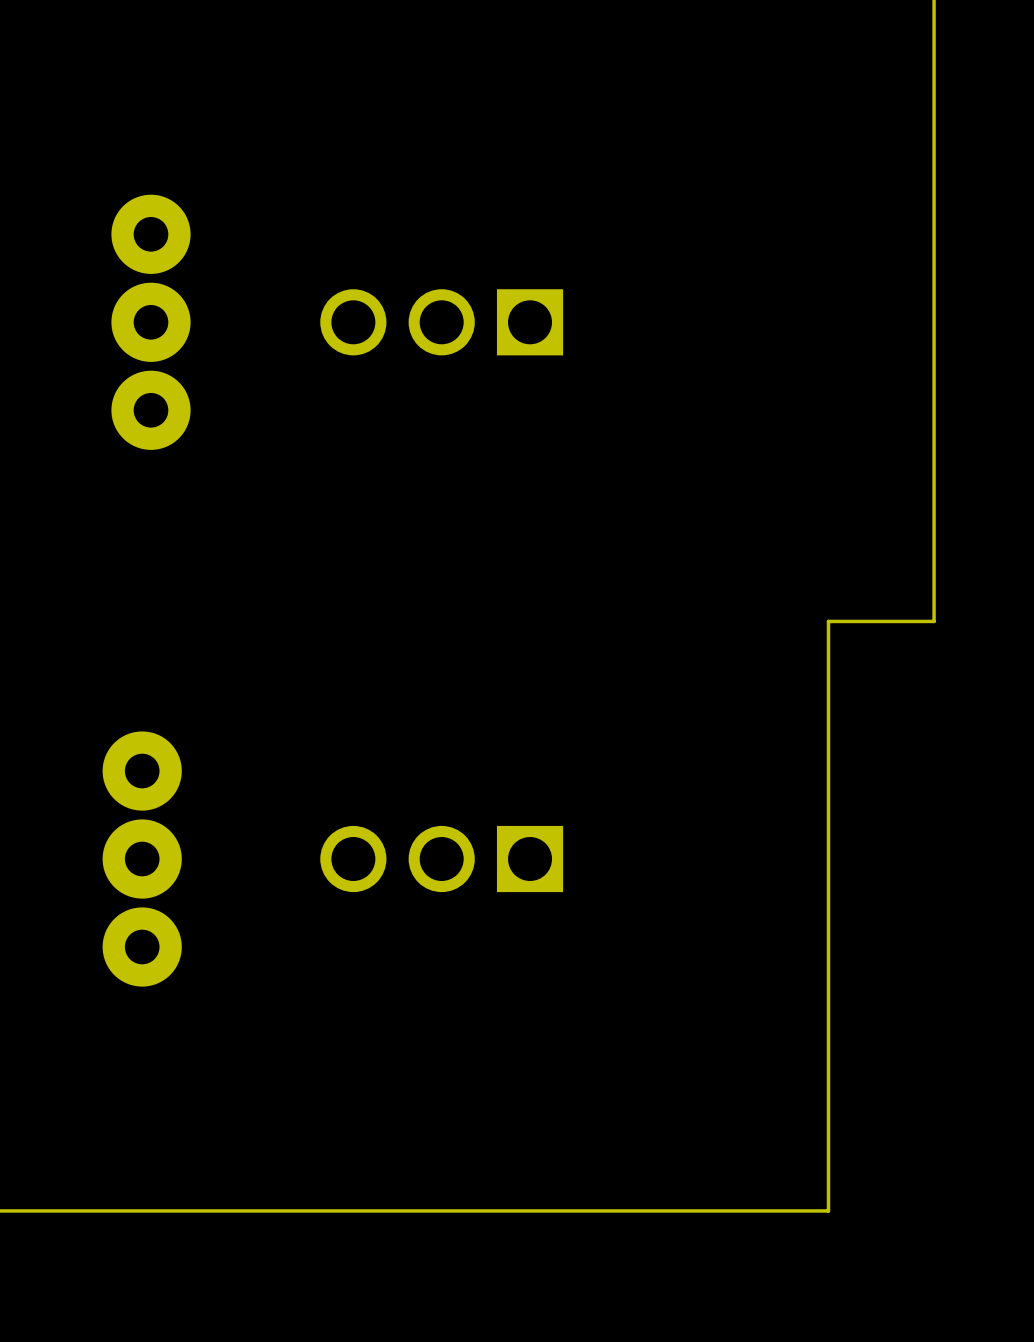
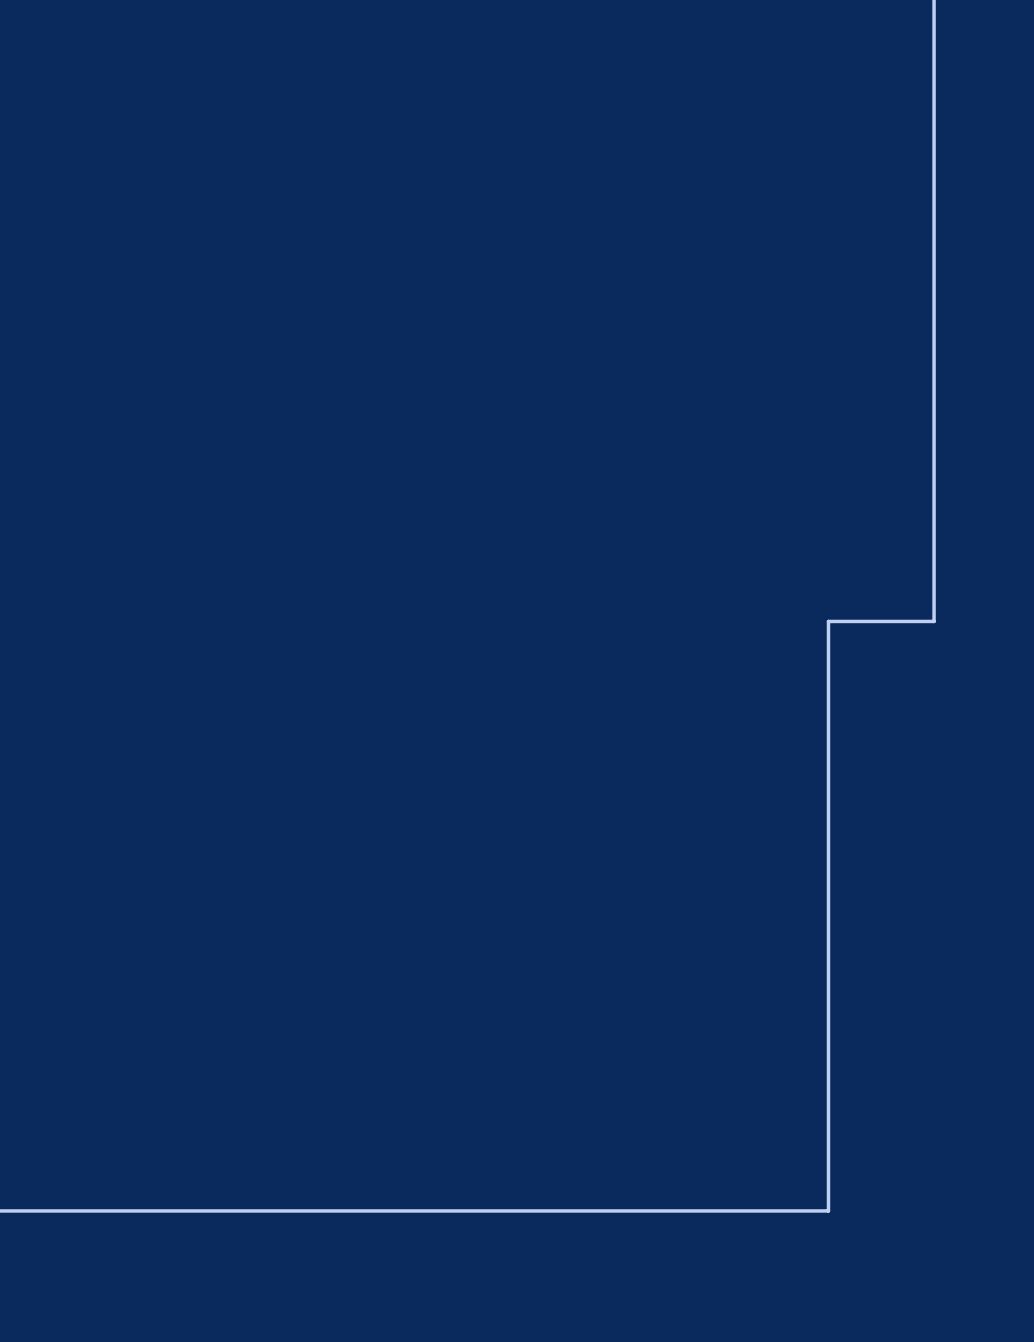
part: (151, 322) -> none
part: (441, 322) -> none
part: (142, 859) -> none
part: (441, 859) -> none

